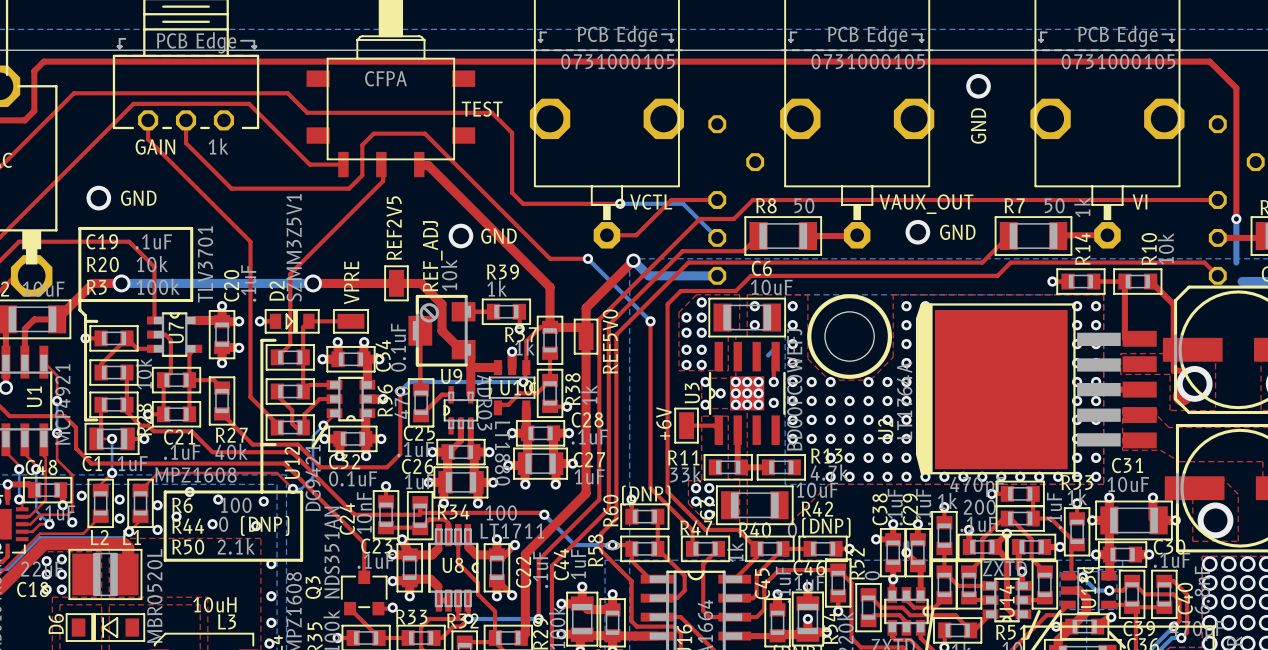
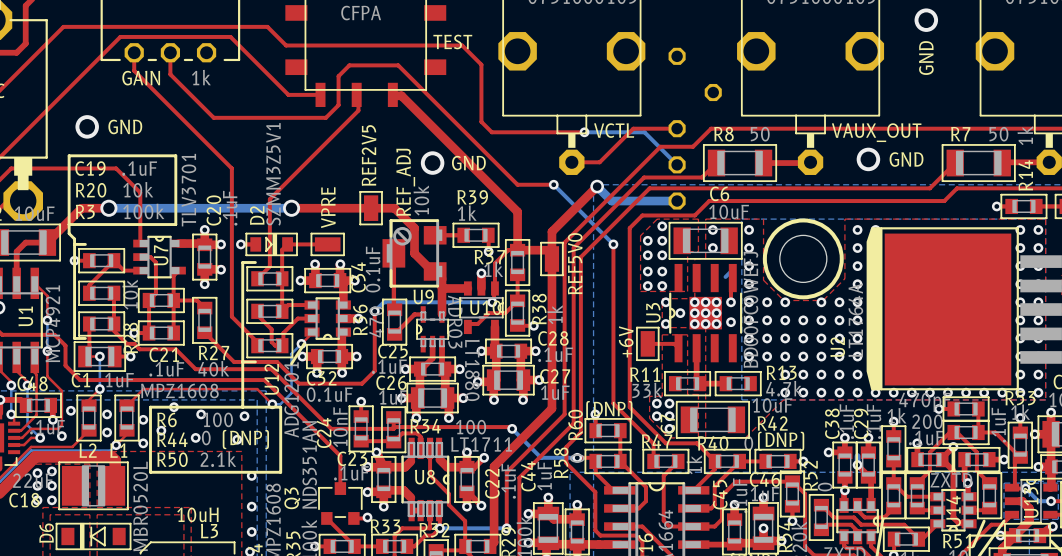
U12 value: DG9421 (313, 478) -> ADG1201 (291, 399)

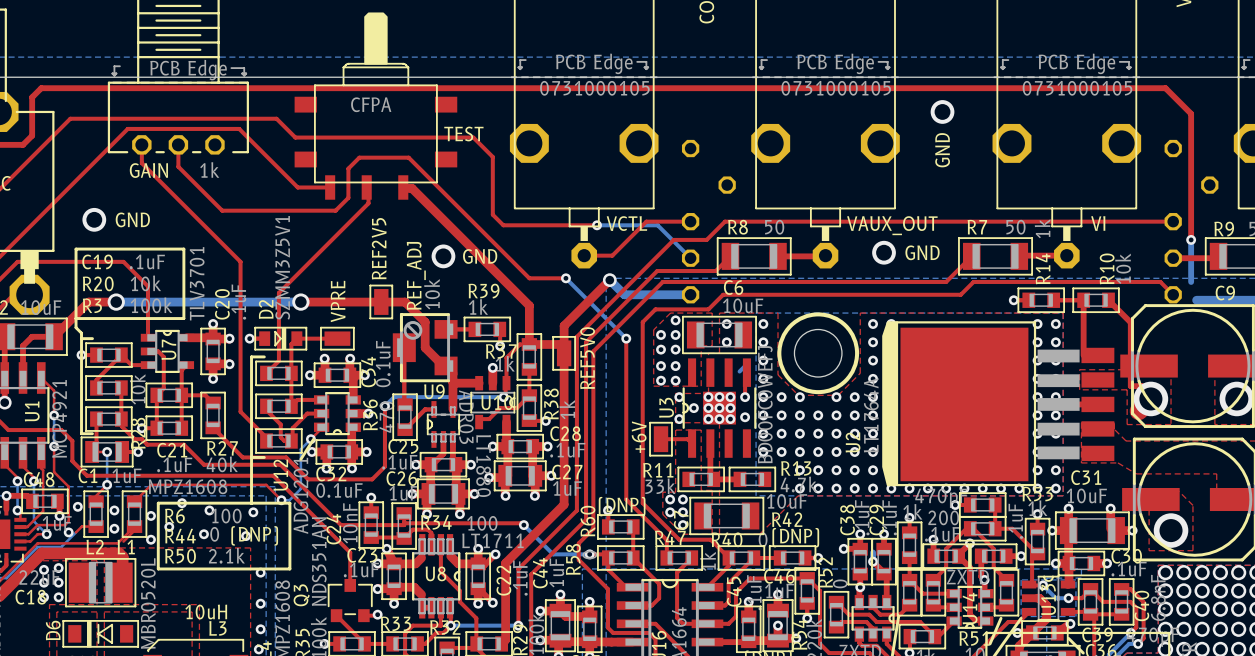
top track: none -> (96, 526) (81, 526) (76, 532)
top track: (89, 432) (89, 430) (72, 446) -> (134, 526) (117, 543) (79, 543)
bottom track: (116, 445) (110, 450) (54, 450) -> (76, 532) (61, 547)
via: (116, 445) -> none

